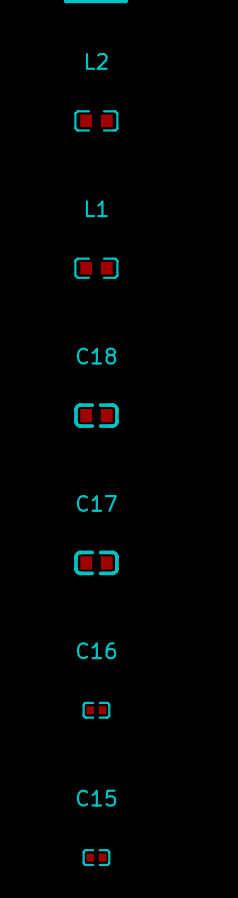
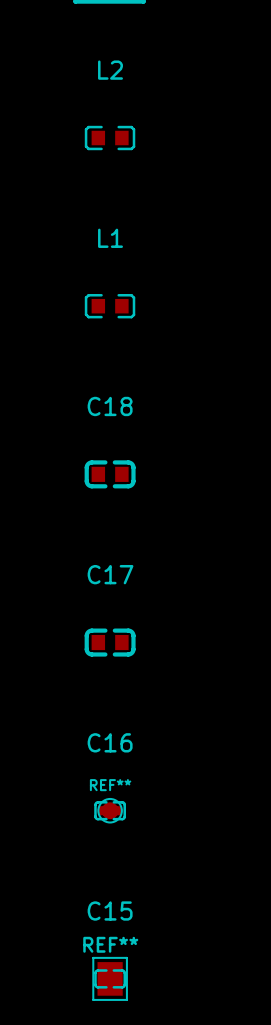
REF**: none -> (110, 810)
REF**: none -> (110, 978)

